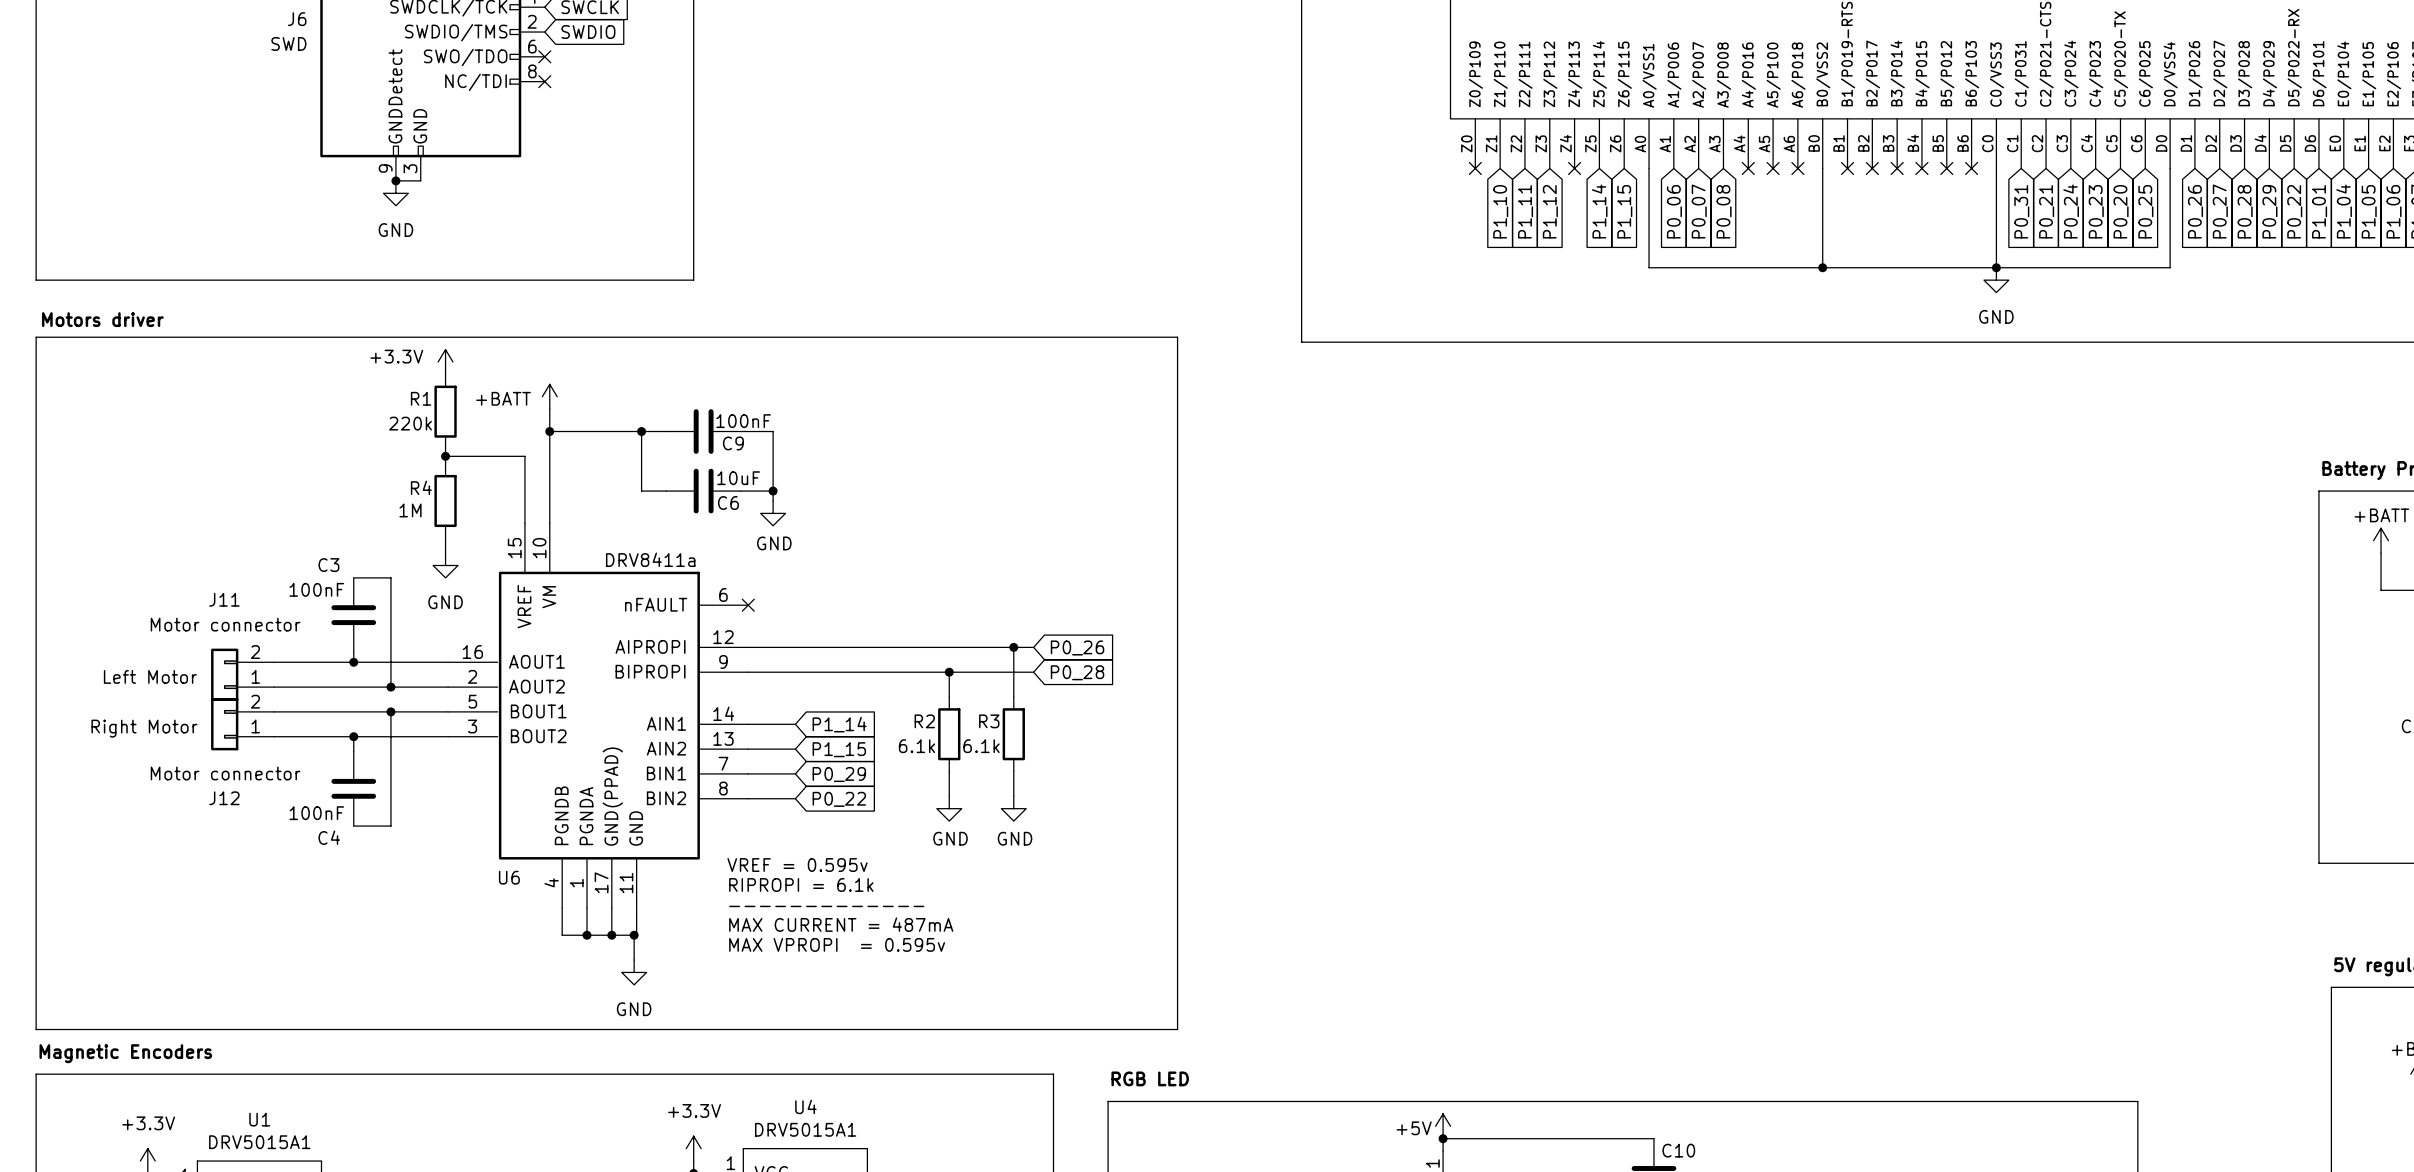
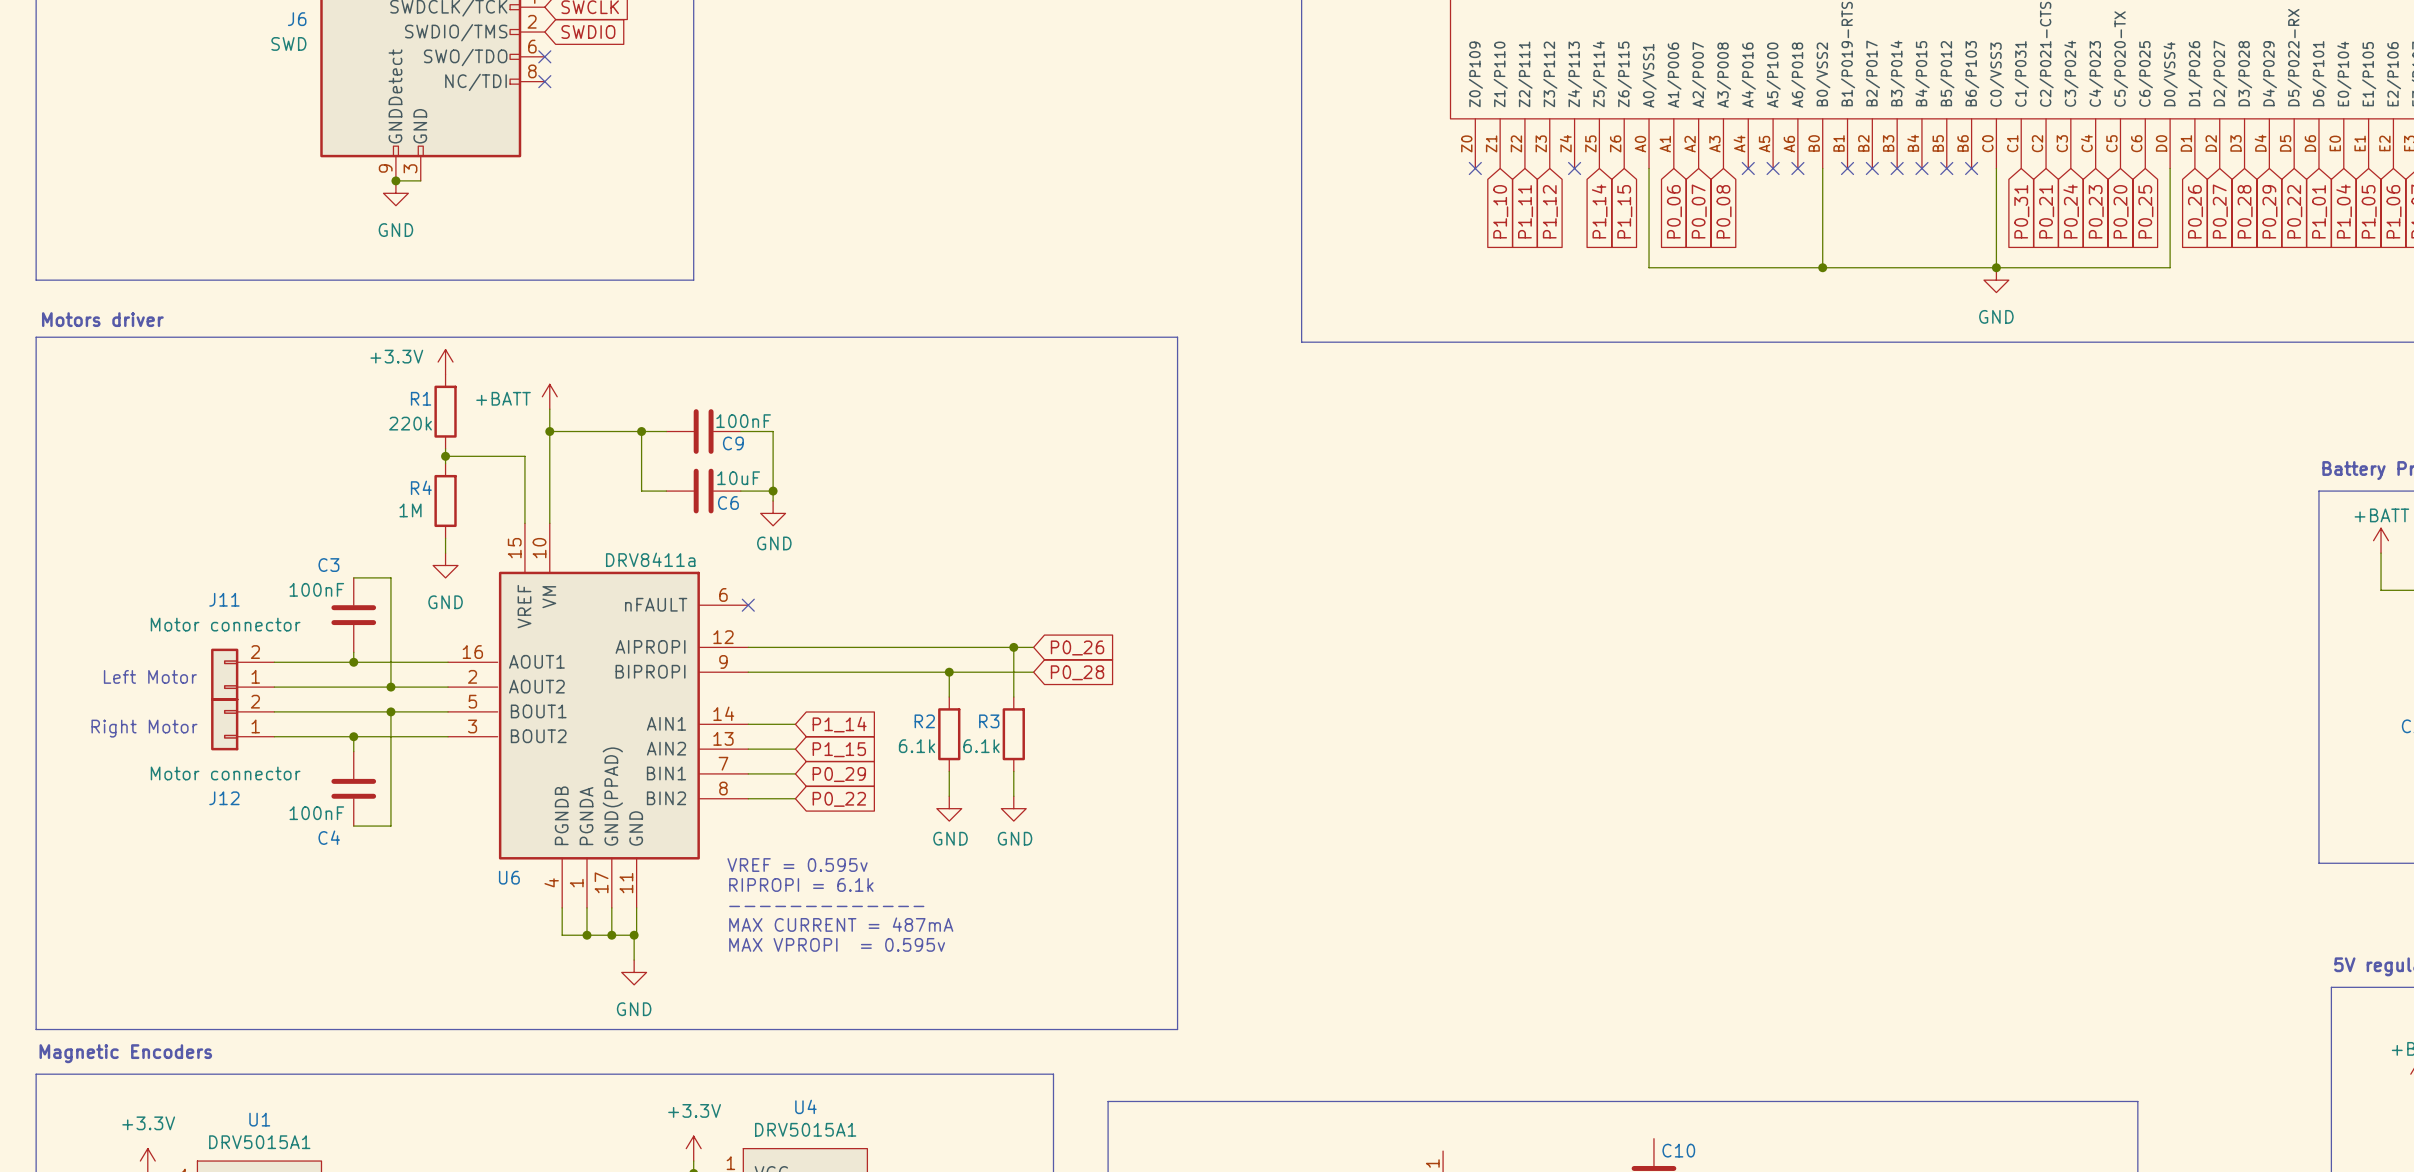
text: RGB LED (1150, 1078) -> none
power symbol: +5V (1443, 1126) -> none
junction: (1443, 1138) -> none
wire: (1653, 1138) (1443, 1138) (1443, 1151) -> none

